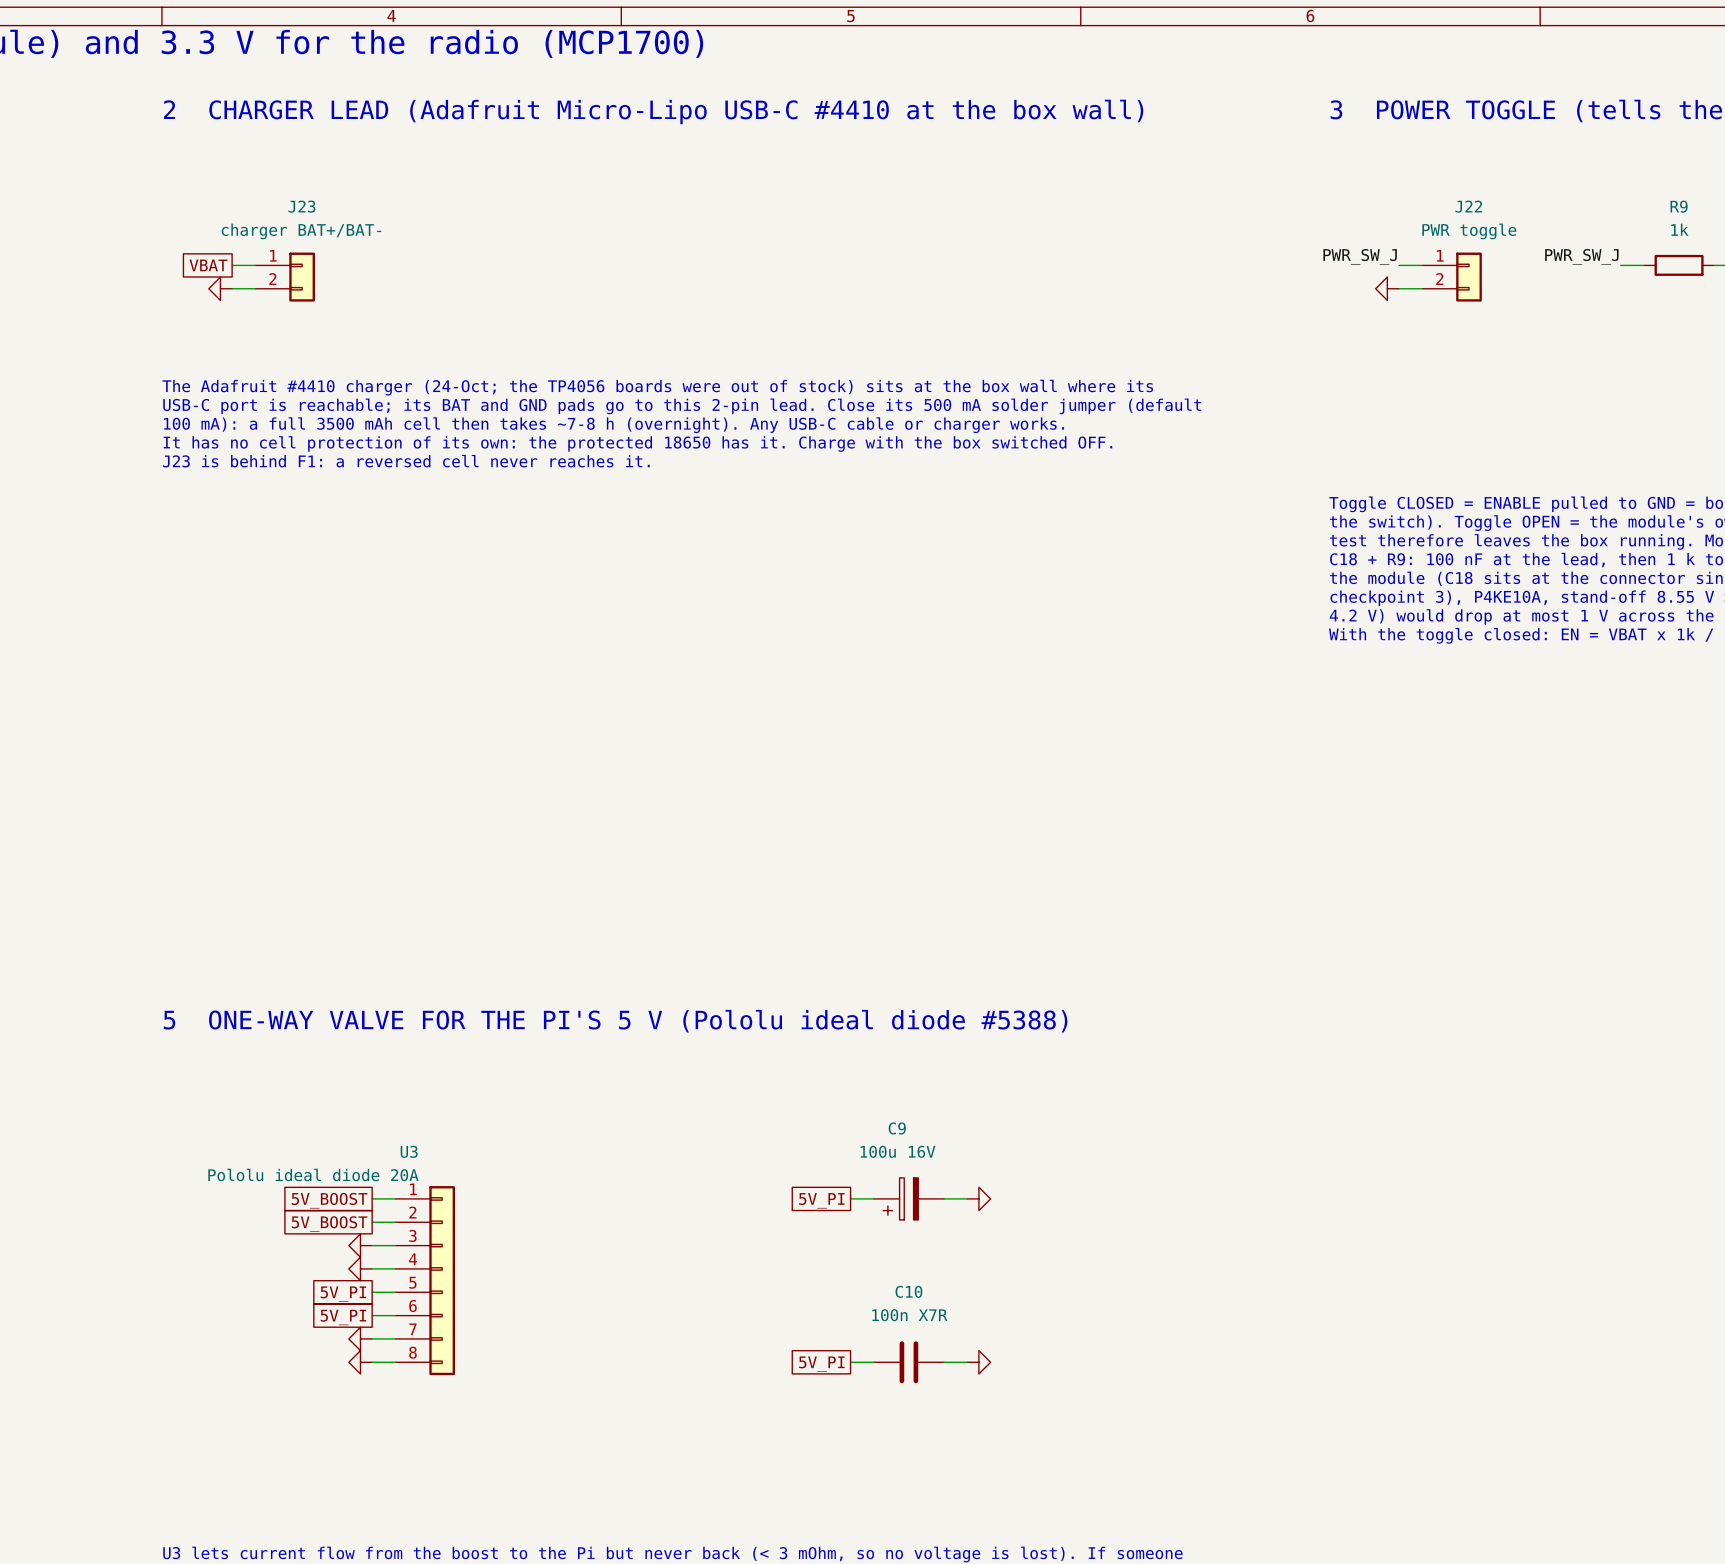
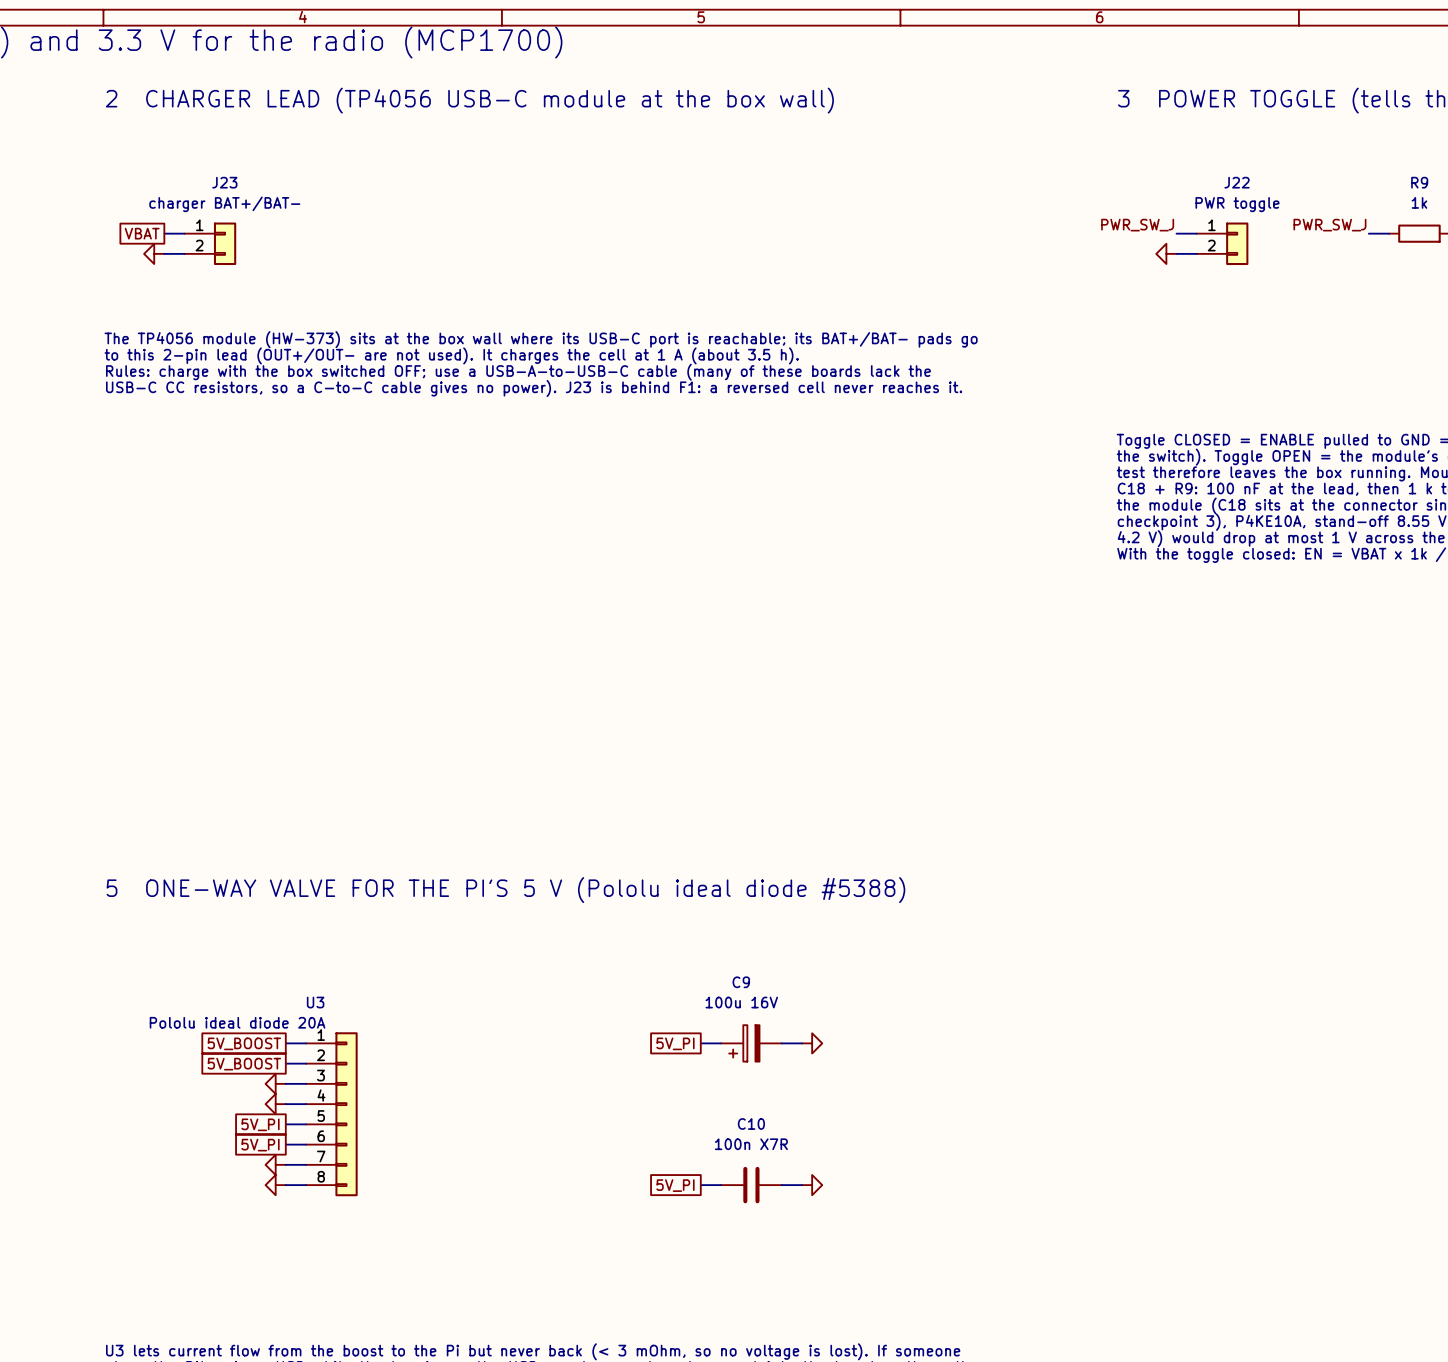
text: 2 CHARGER LEAD (Adafruit Micro-Lipo USB-C #4410 at the box wall) (653, 111) -> 2 CHARGER LEAD (TP4056 USB-C module at the box wall) (469, 100)
text: The Adafruit #4410 charger (24-Oct; the TP4056 boards were out of stock) sits at the box wall where its (657, 387) -> The TP4056 module (HW-373) sits at the box wall where its USB-C port is reachable; its BAT+/BAT- pads go (541, 339)
text: USB-C port is reachable; its BAT and GND pads go to this 2-pin lead. Close its 500 mA solder jumper (default (682, 406) -> to this 2-pin lead (OUT+/OUT- are not used). It charges the cell at 1 A (about 3.5 h). (451, 355)
text: 100 mA): a full 3500 mAh cell then takes ~7-8 h (overnight). Any USB-C cable or charger works. (614, 425) -> Rules: charge with the box switched OFF; use a USB-A-to-USB-C cable (many of these boards lack the (518, 372)
text: It has no cell protection of its own: the protected 18650 has it. Charge with the box switched OFF. (637, 443) -> USB-C CC resistors, so a C-to-C cable gives no power). J23 is behind F1: a reversed cell never reaches it. (534, 388)
text: J23 is behind F1: a reversed cell never reaches it. (406, 461) -> none

